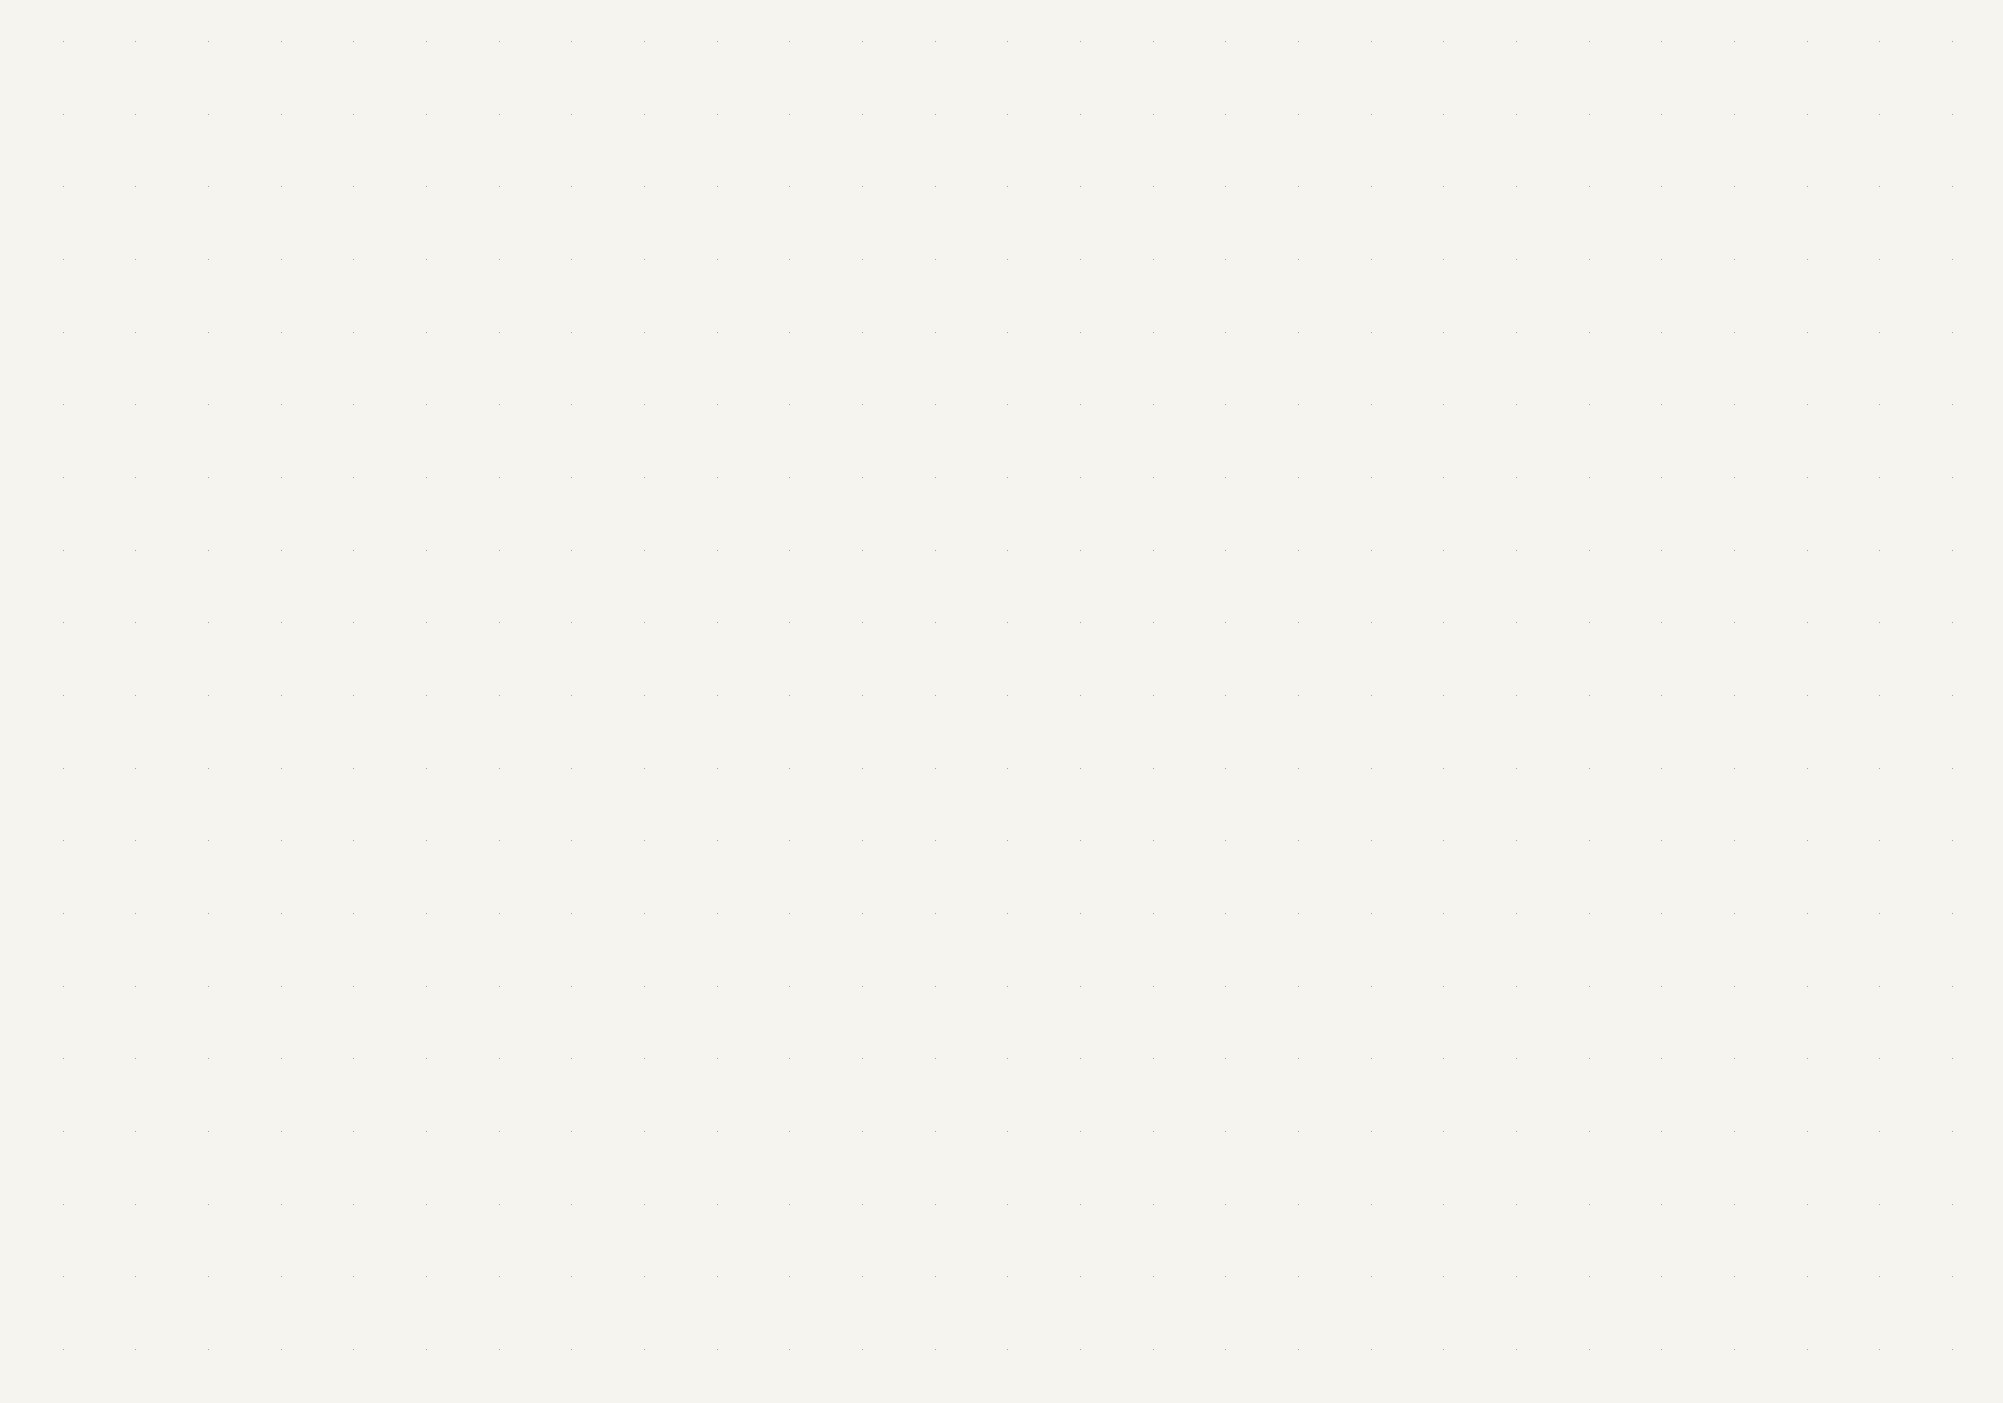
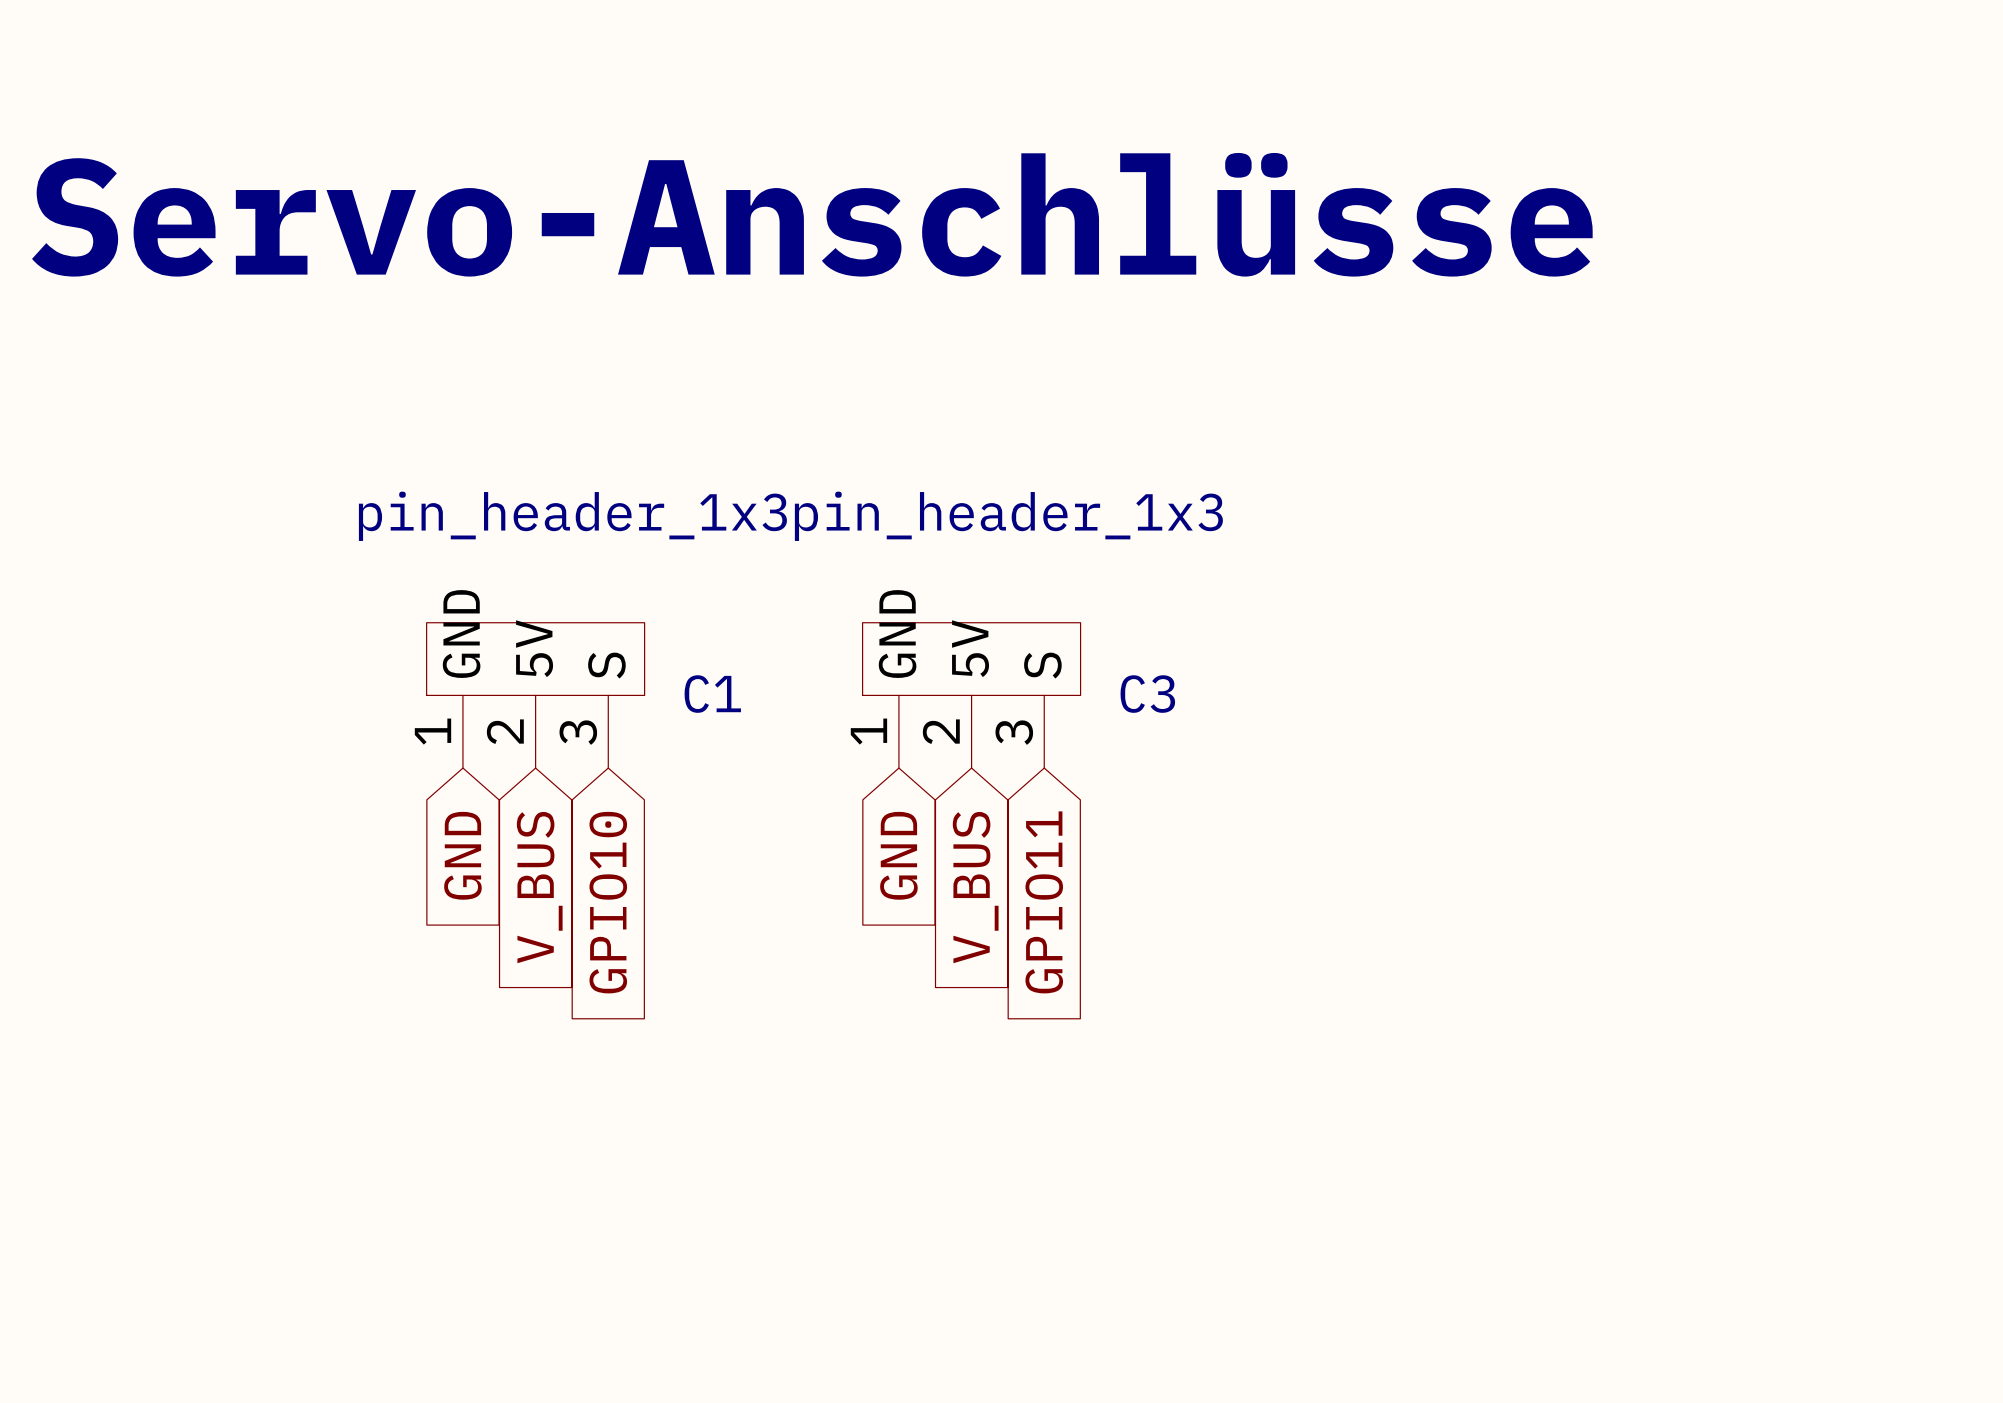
text: none -> Servo-Anschlüsse (812, 214)
C1: none -> pin_header_1x3 (535, 695)
C3: none -> pin_header_1x3 (971, 695)
global label: none -> GND (462, 855)
global label: none -> GND (898, 855)
global label: none -> V_BUS (539, 887)
global label: none -> V_BUS (975, 887)
global label: none -> GPIO10 (608, 902)
global label: none -> GPIO11 (1044, 902)

